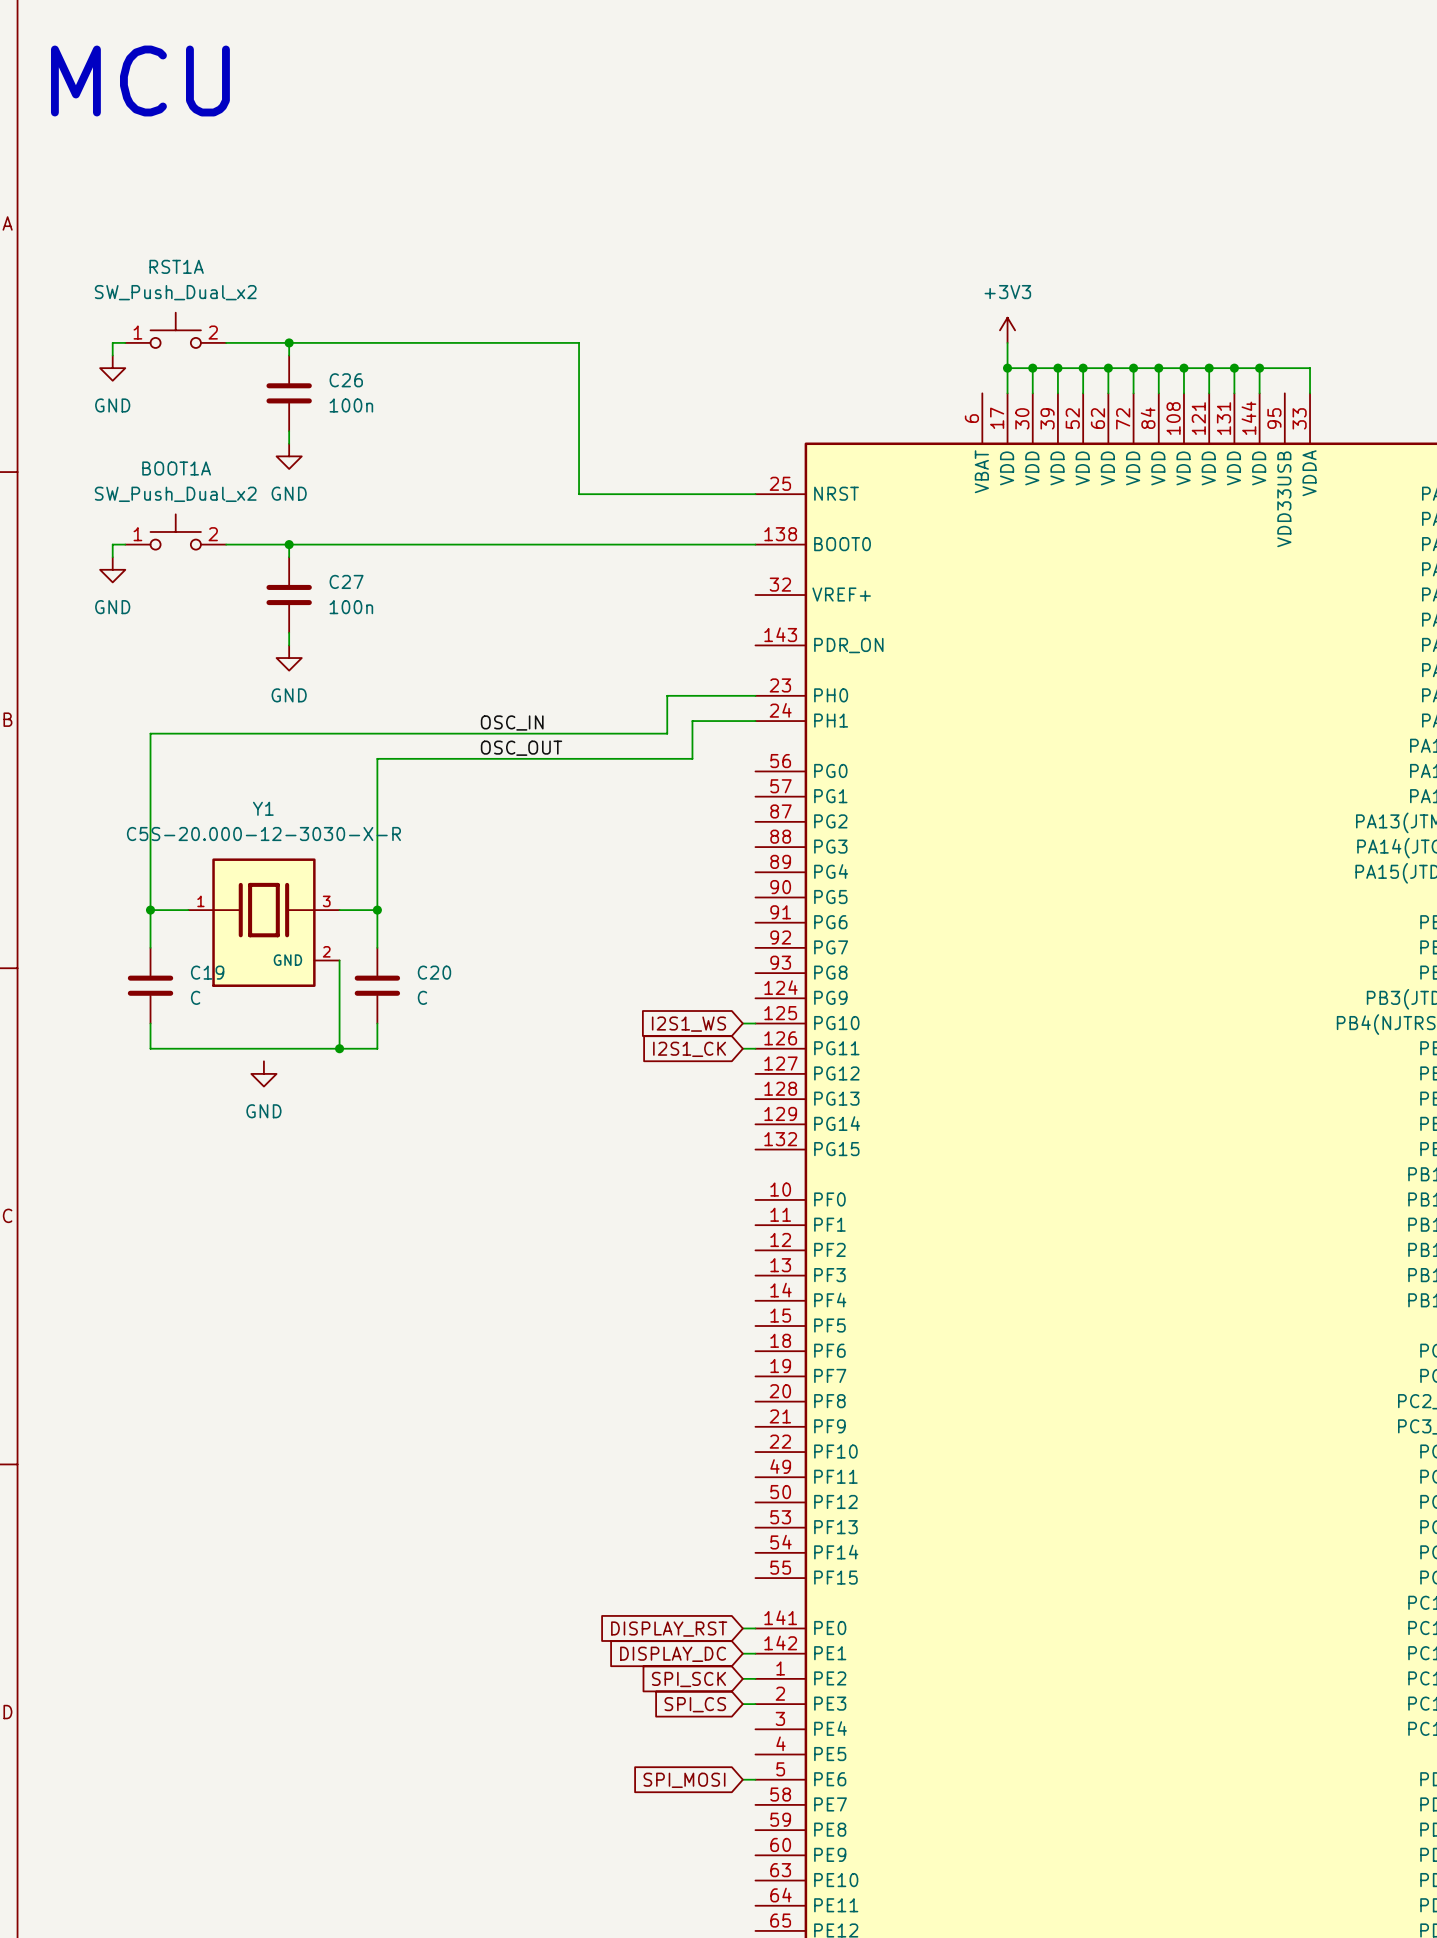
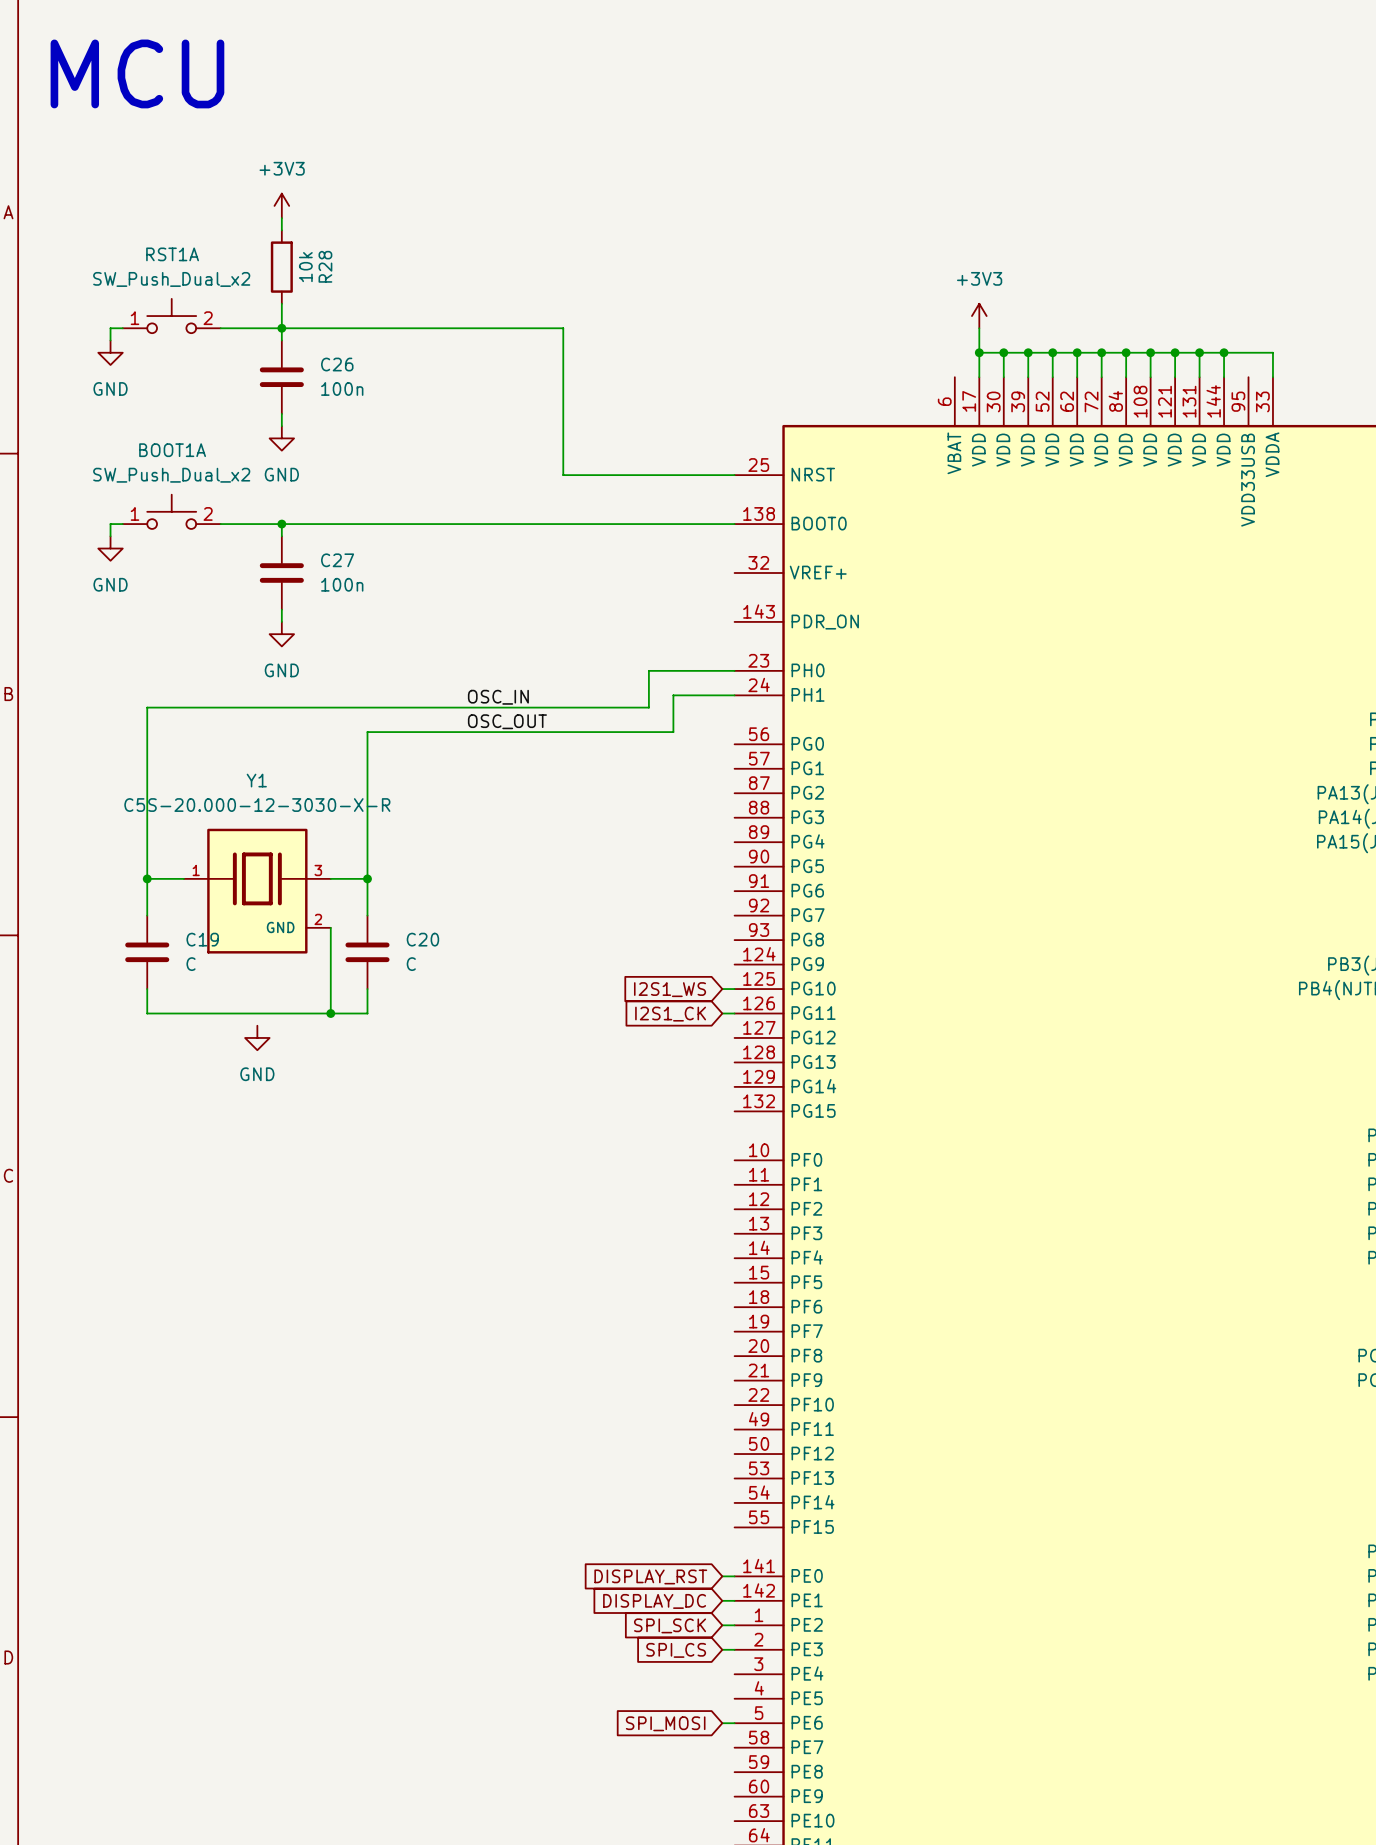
power symbol: none -> +3V3 (281, 205)
wire: none -> (281, 218) (281, 230)
R28: none -> 10k (281, 267)
wire: none -> (281, 303) (281, 328)

